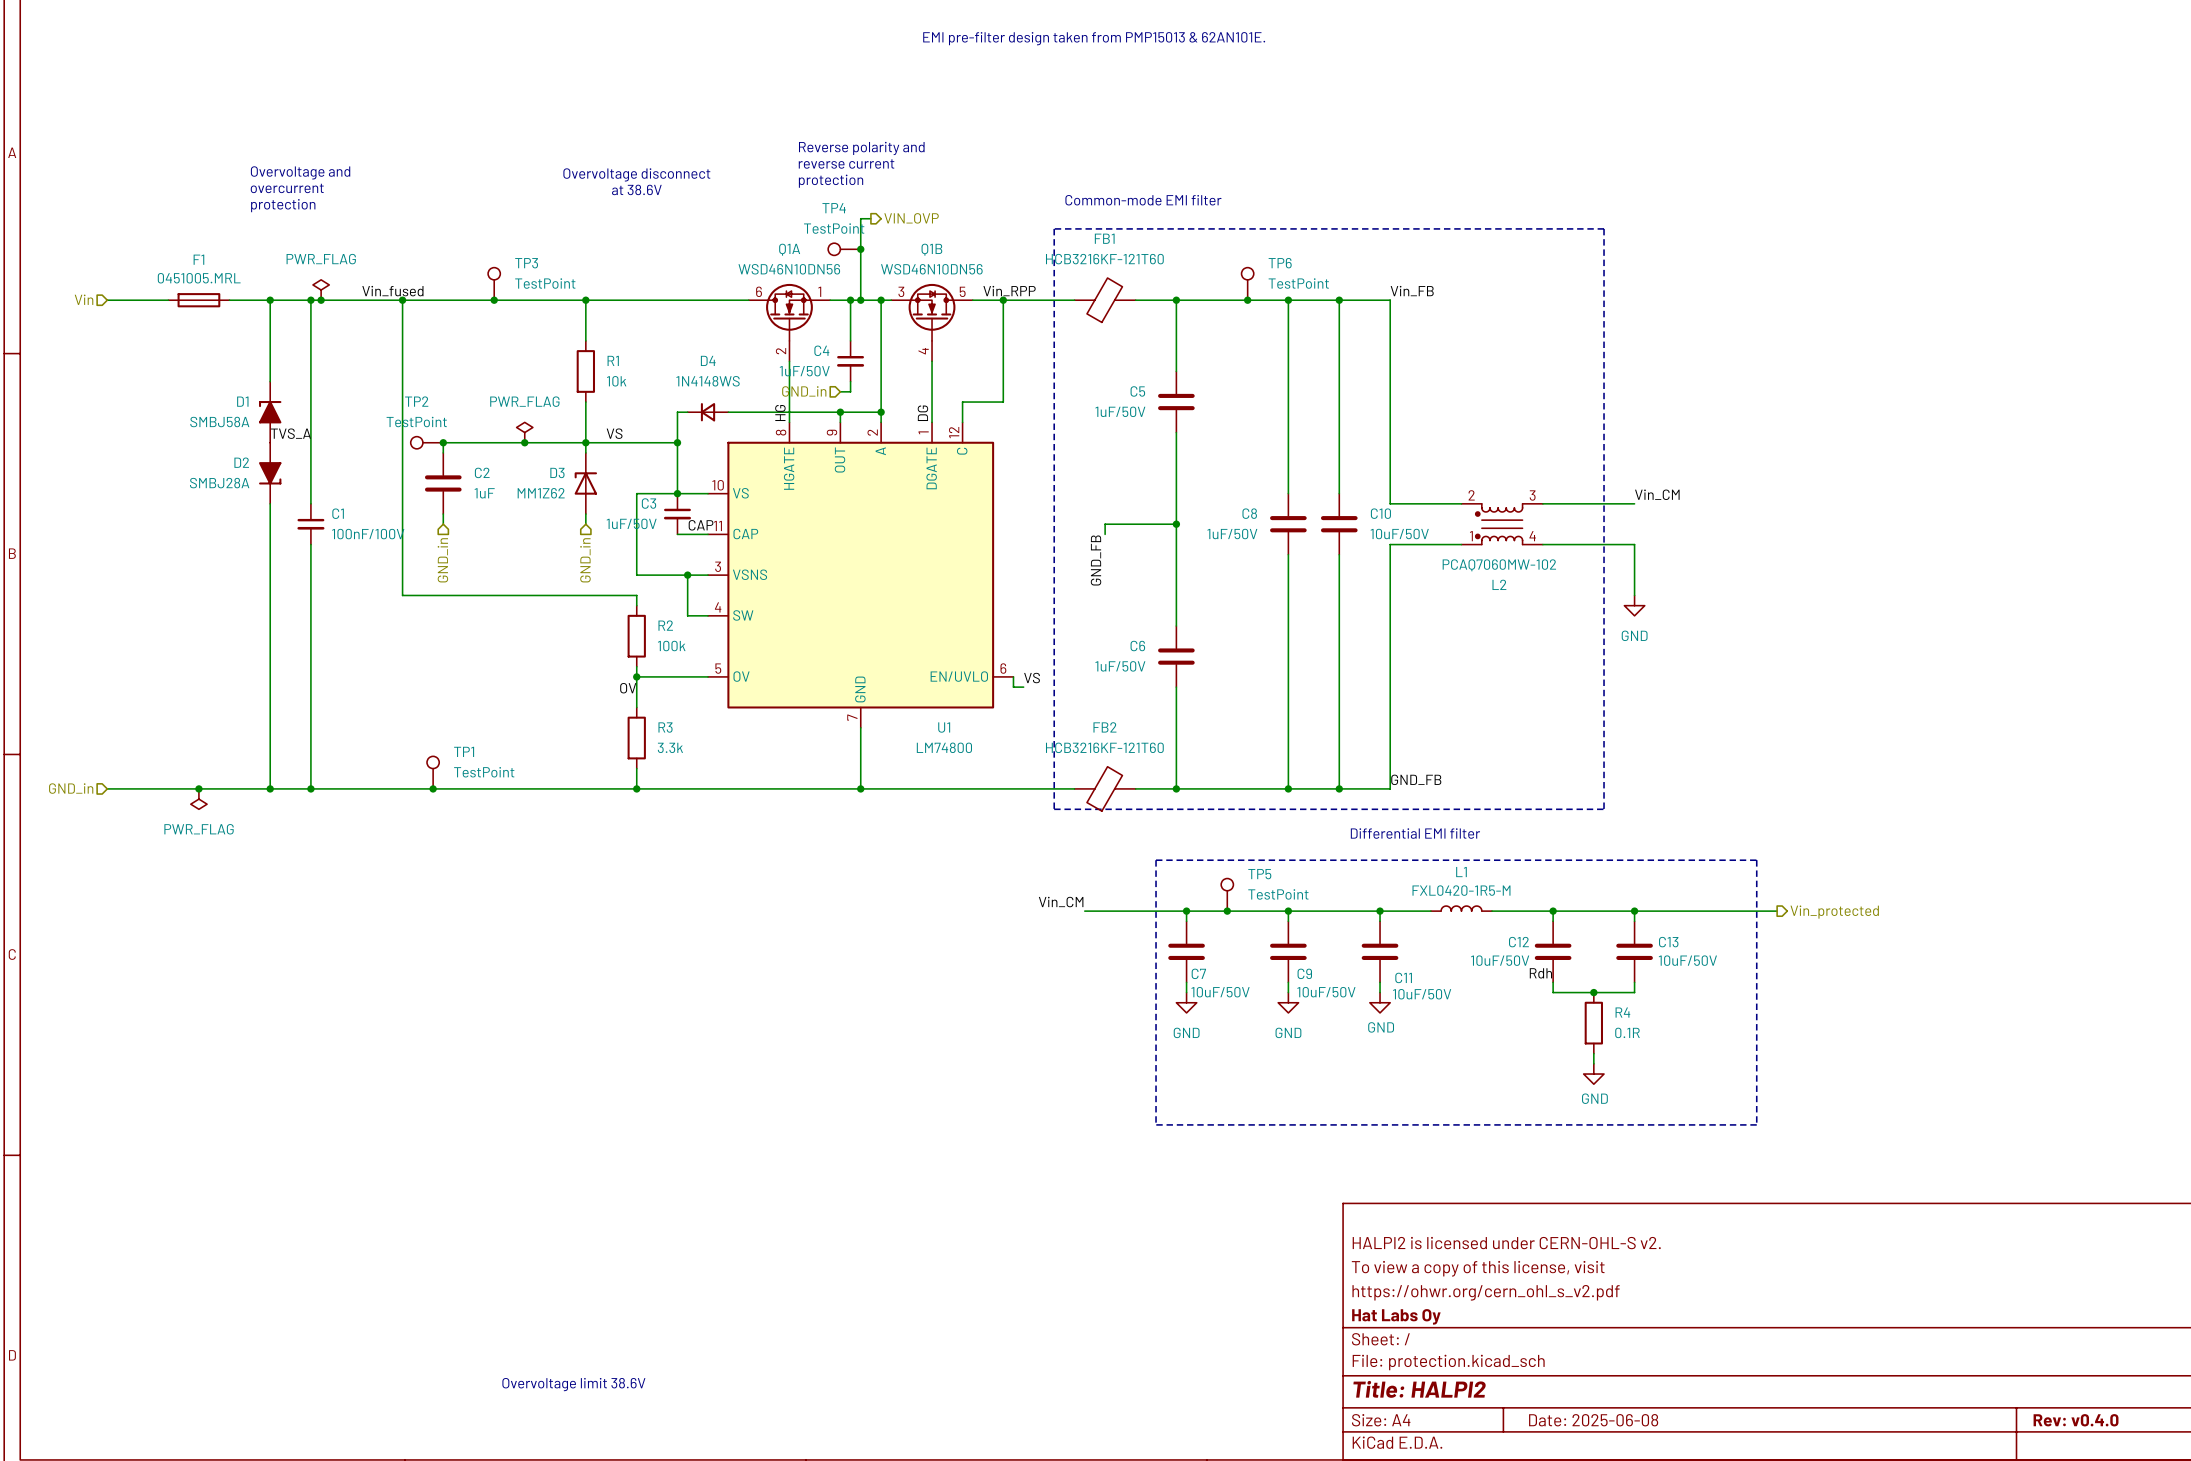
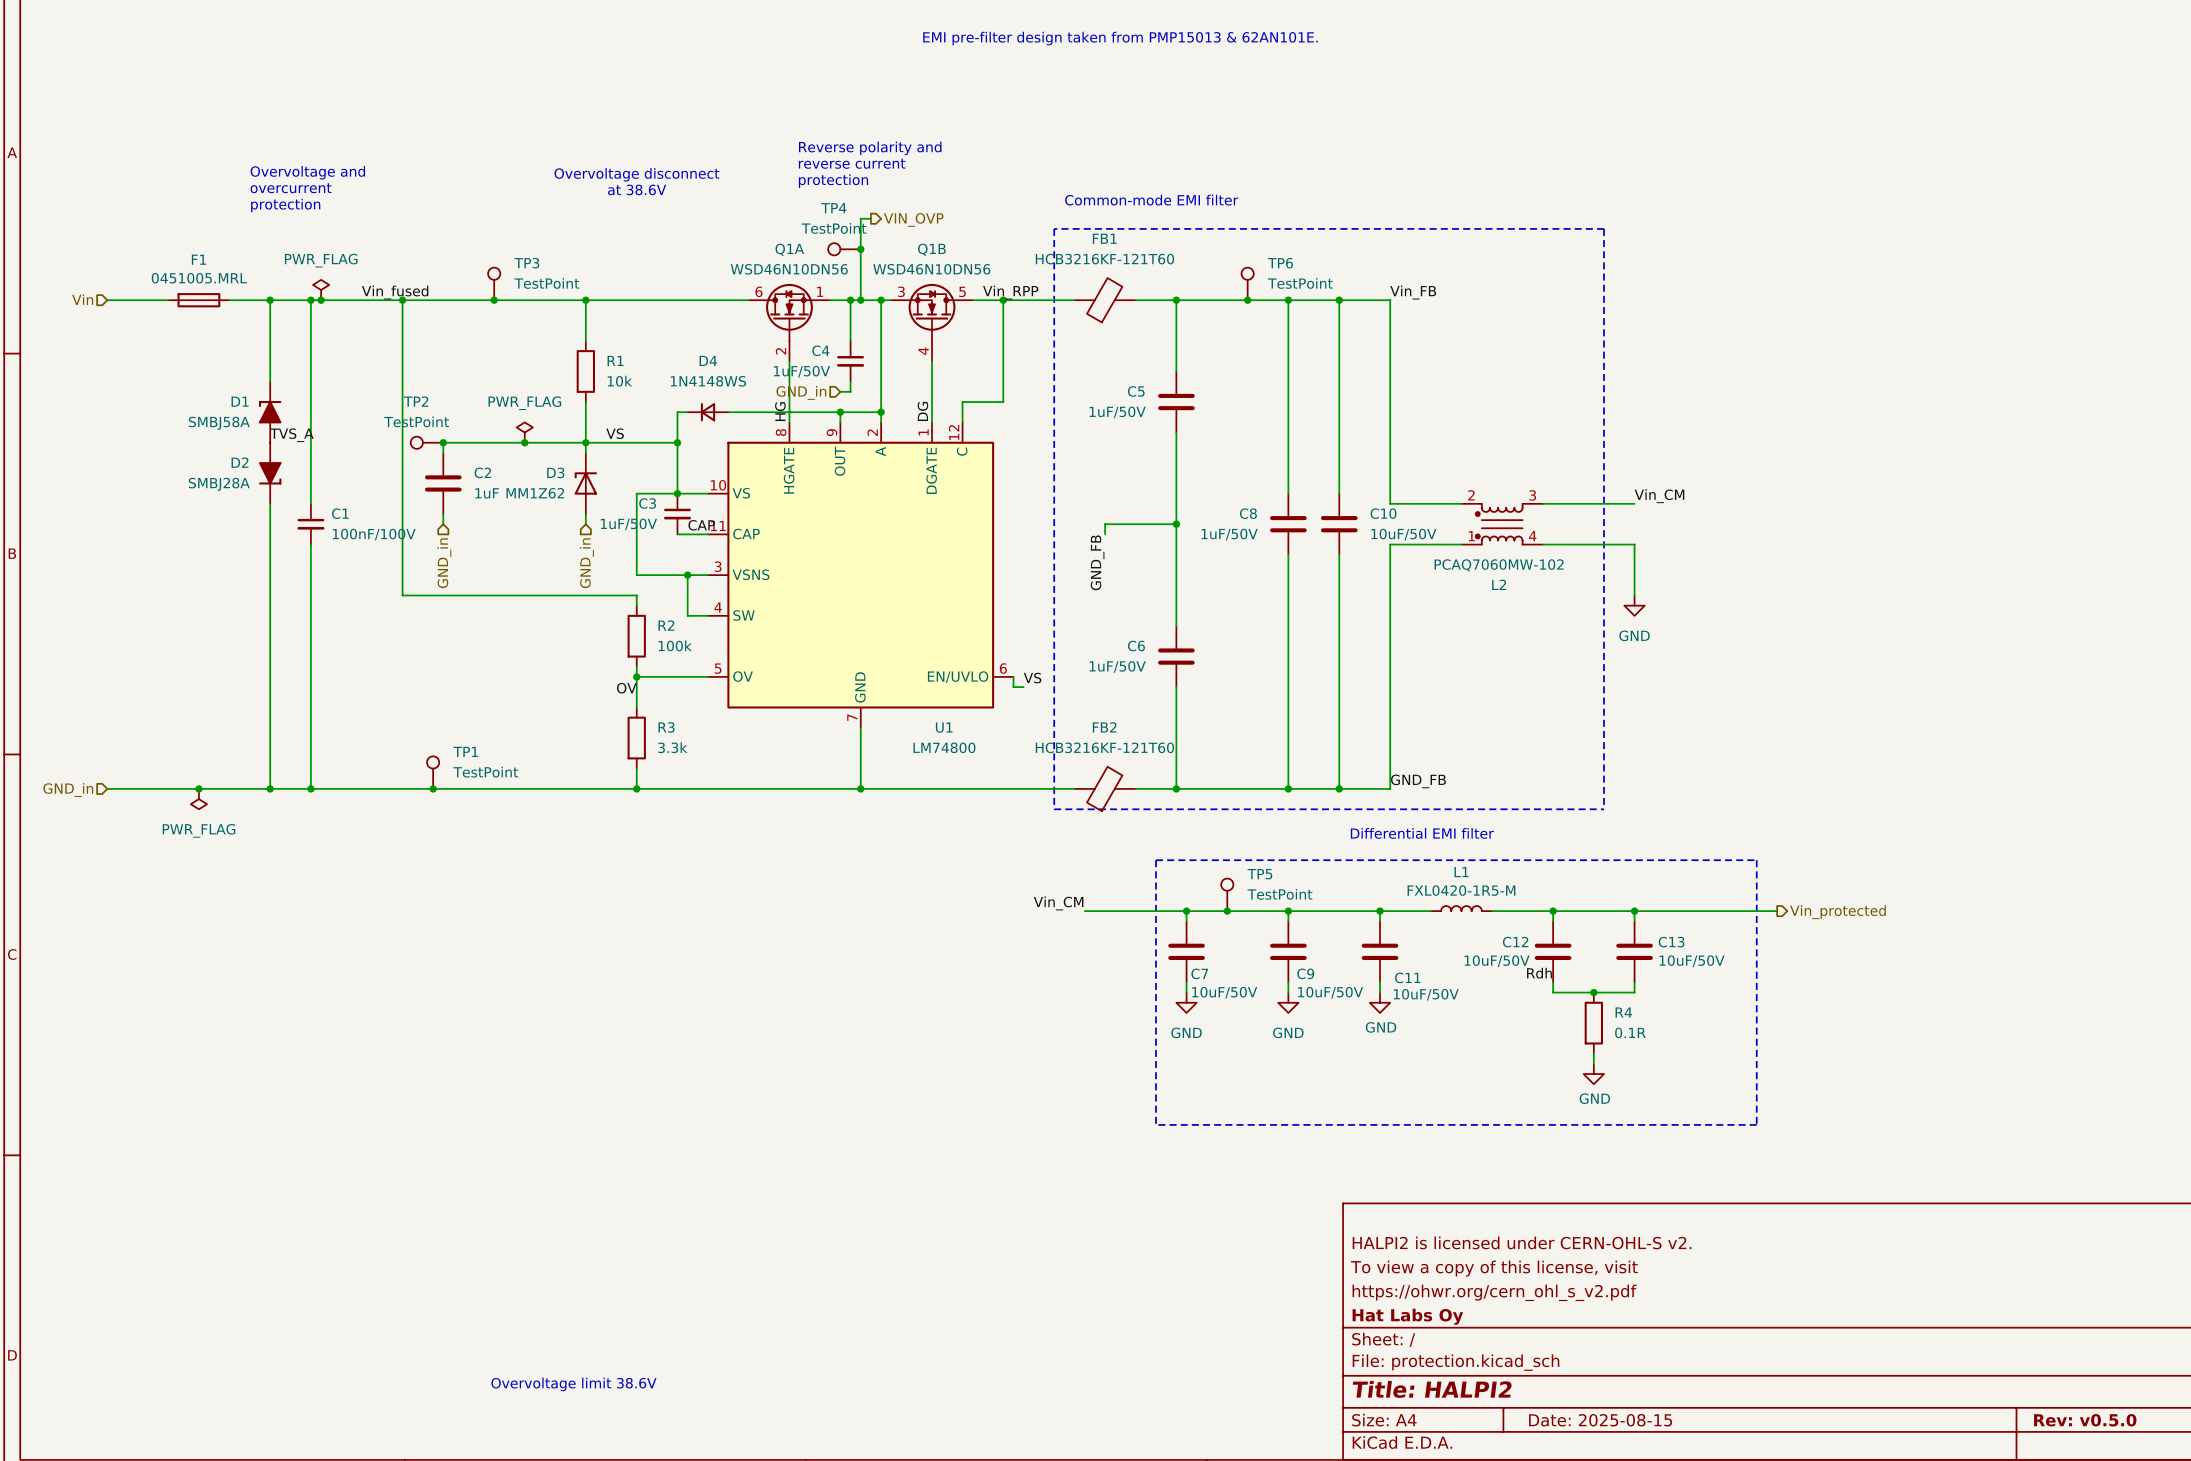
title block: Date: 2025-06-08 (1593, 1420) -> Date: 2025-08-15 (1600, 1420)
title block: Rev: v0.4.0 (2076, 1420) -> Rev: v0.5.0 (2085, 1420)

